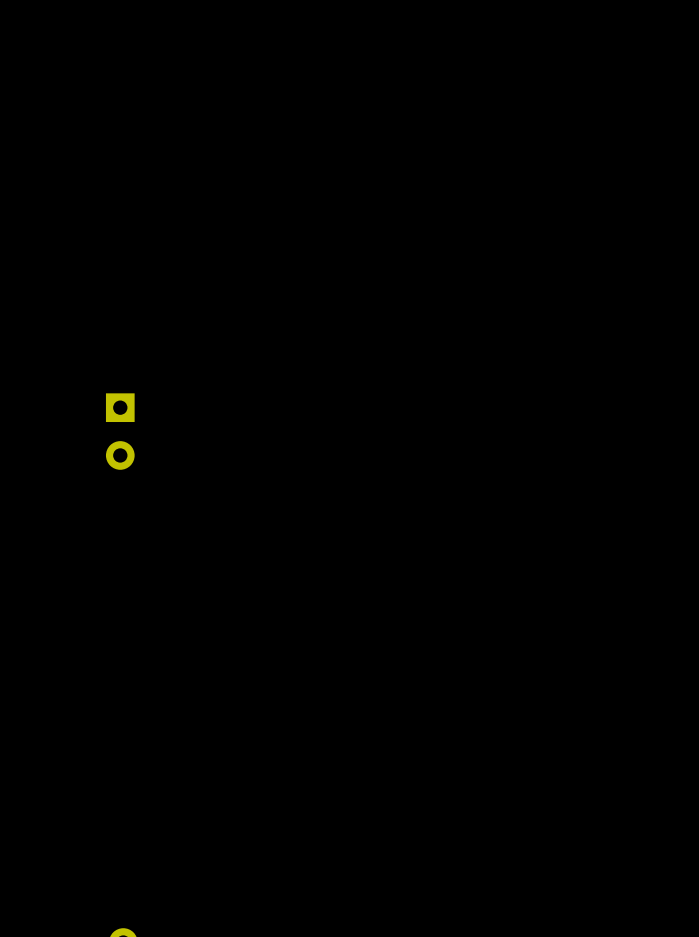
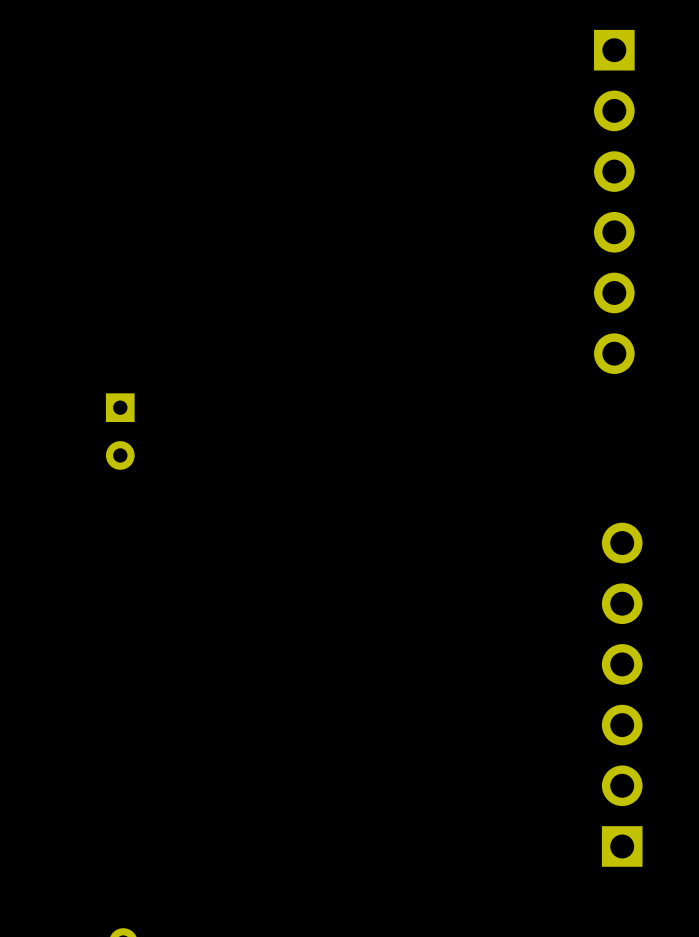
part: none -> (614, 201)
part: none -> (622, 694)

